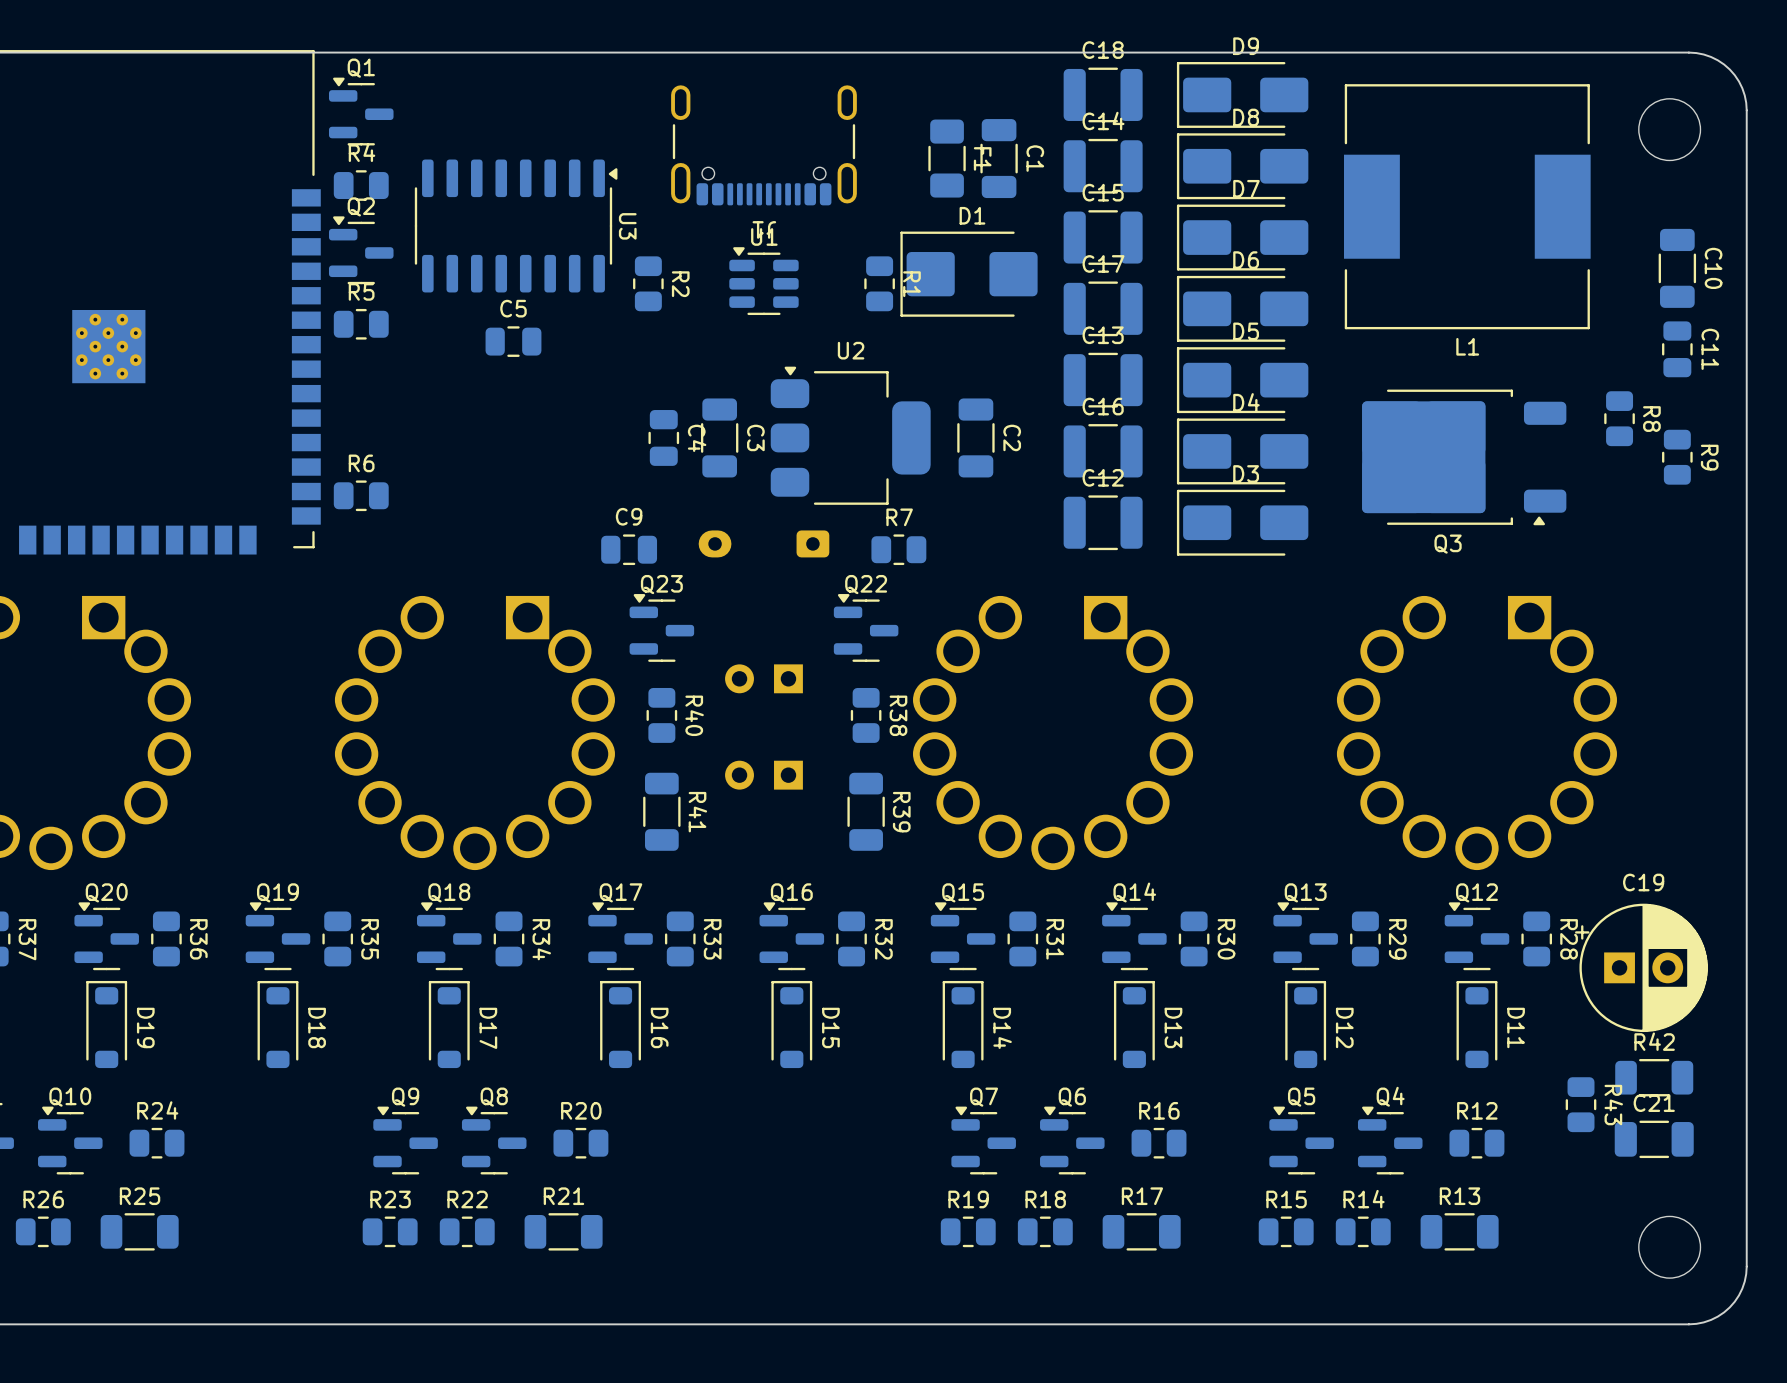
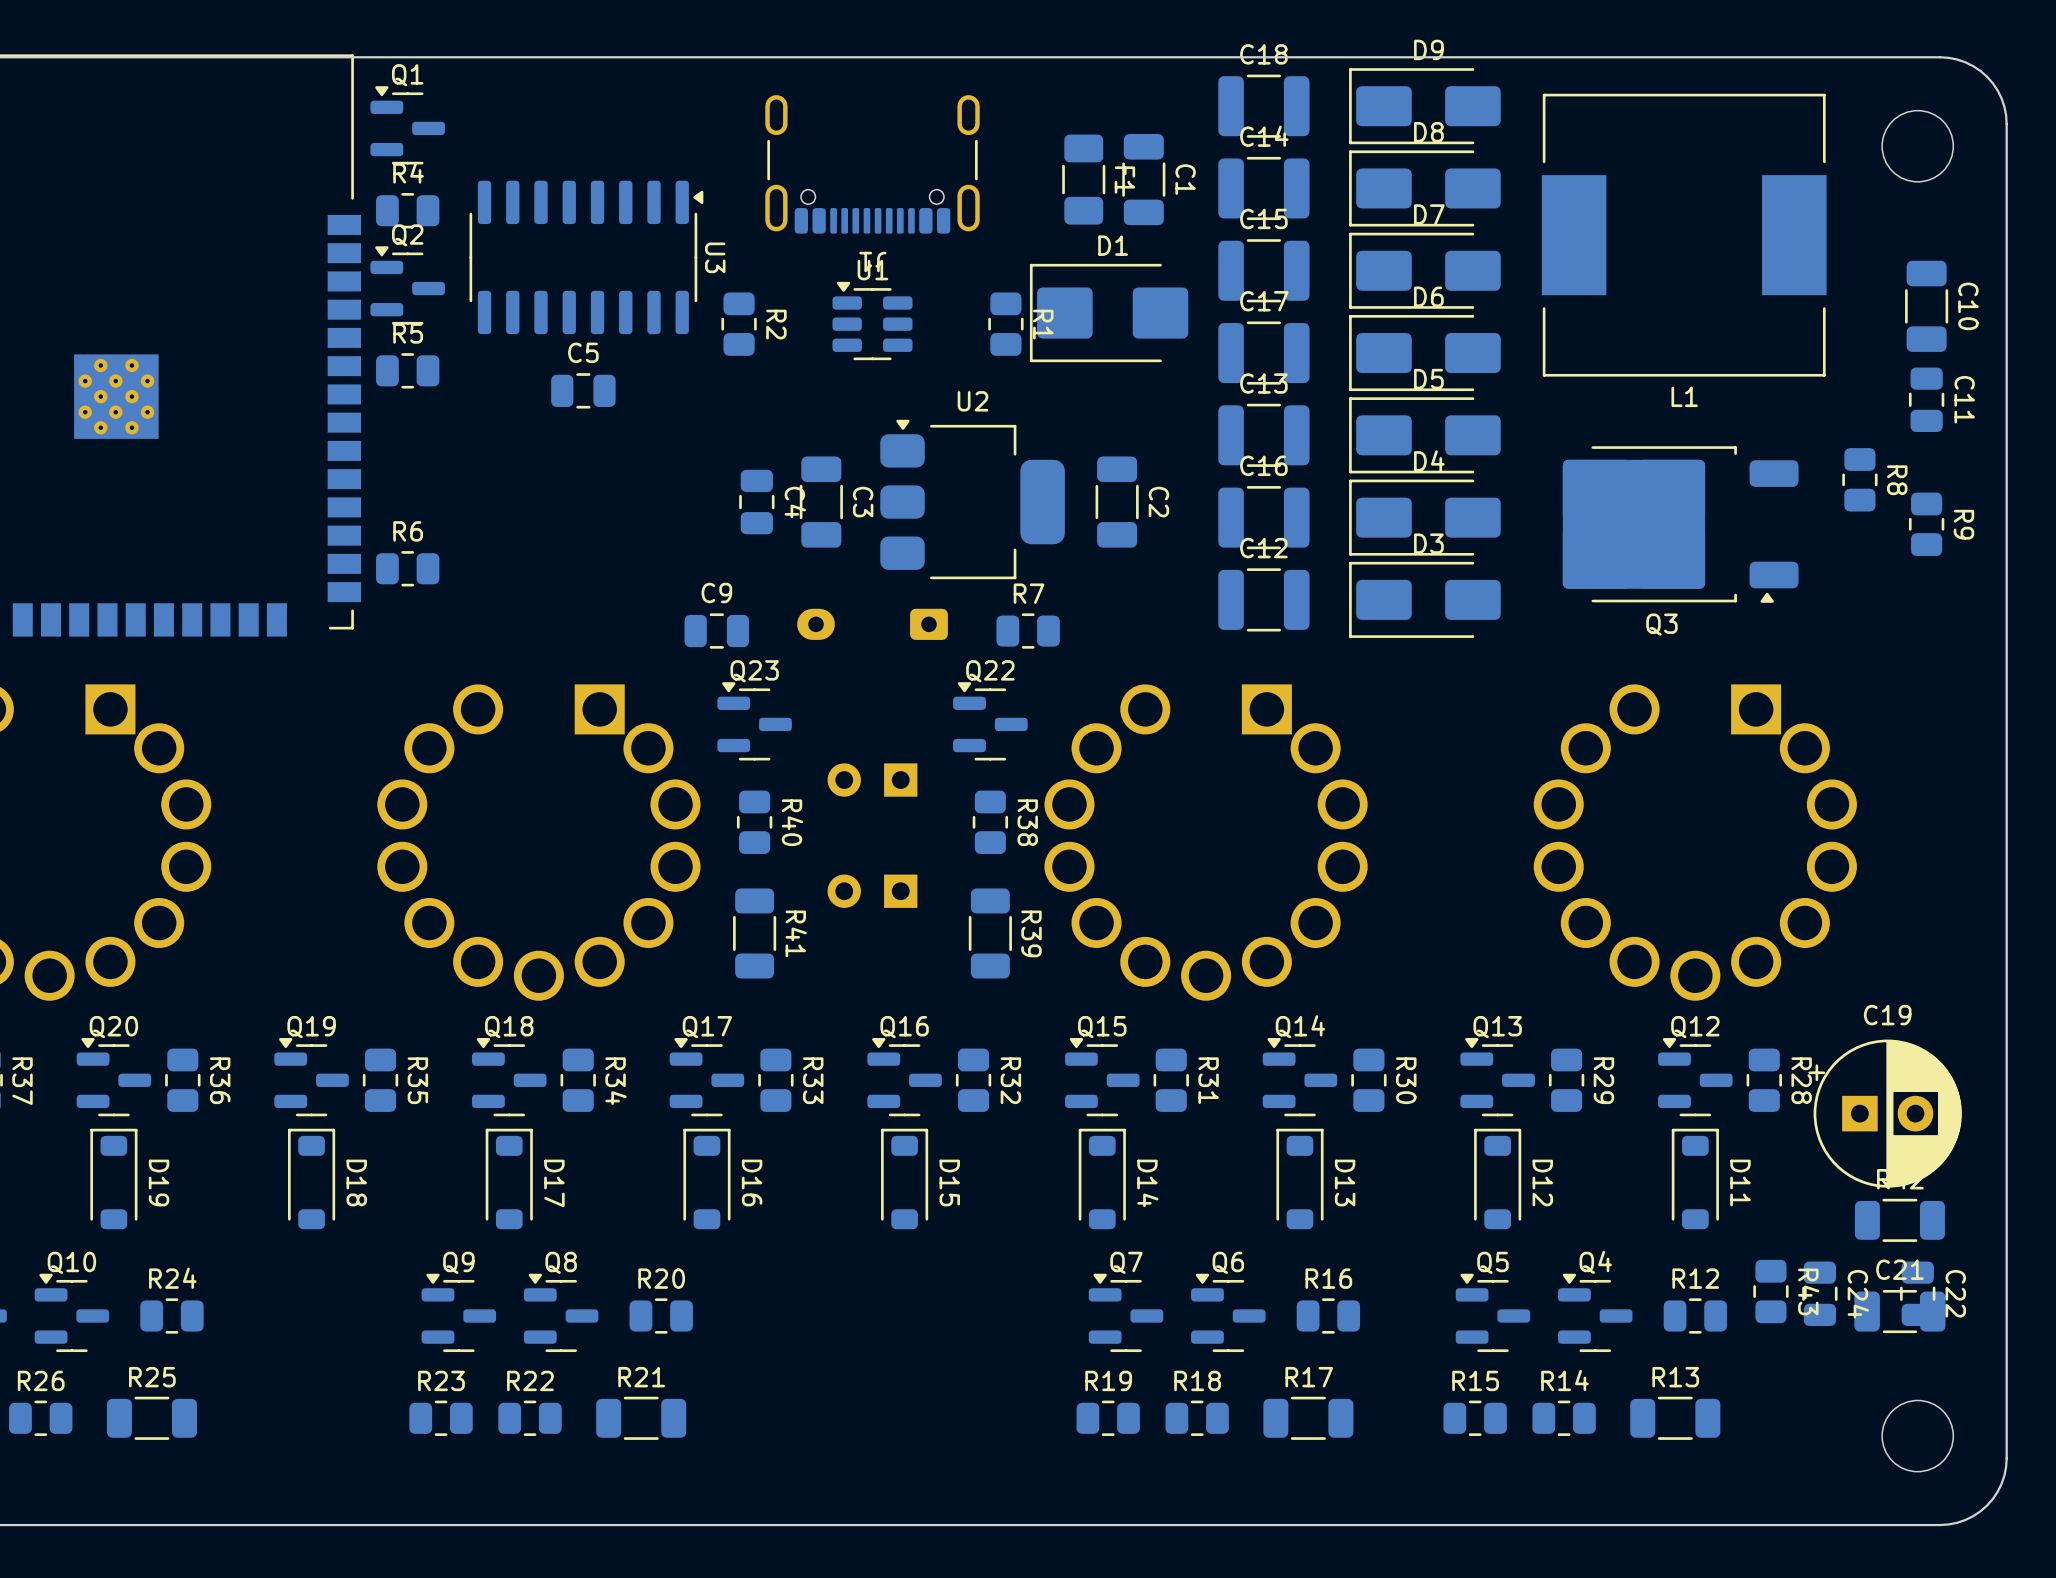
R42 position: (1654, 1077) -> (1899, 1220)
R43 position: (1581, 1104) -> (1770, 1291)
C24: none -> (1819, 1293)
C22: none -> (1917, 1293)

